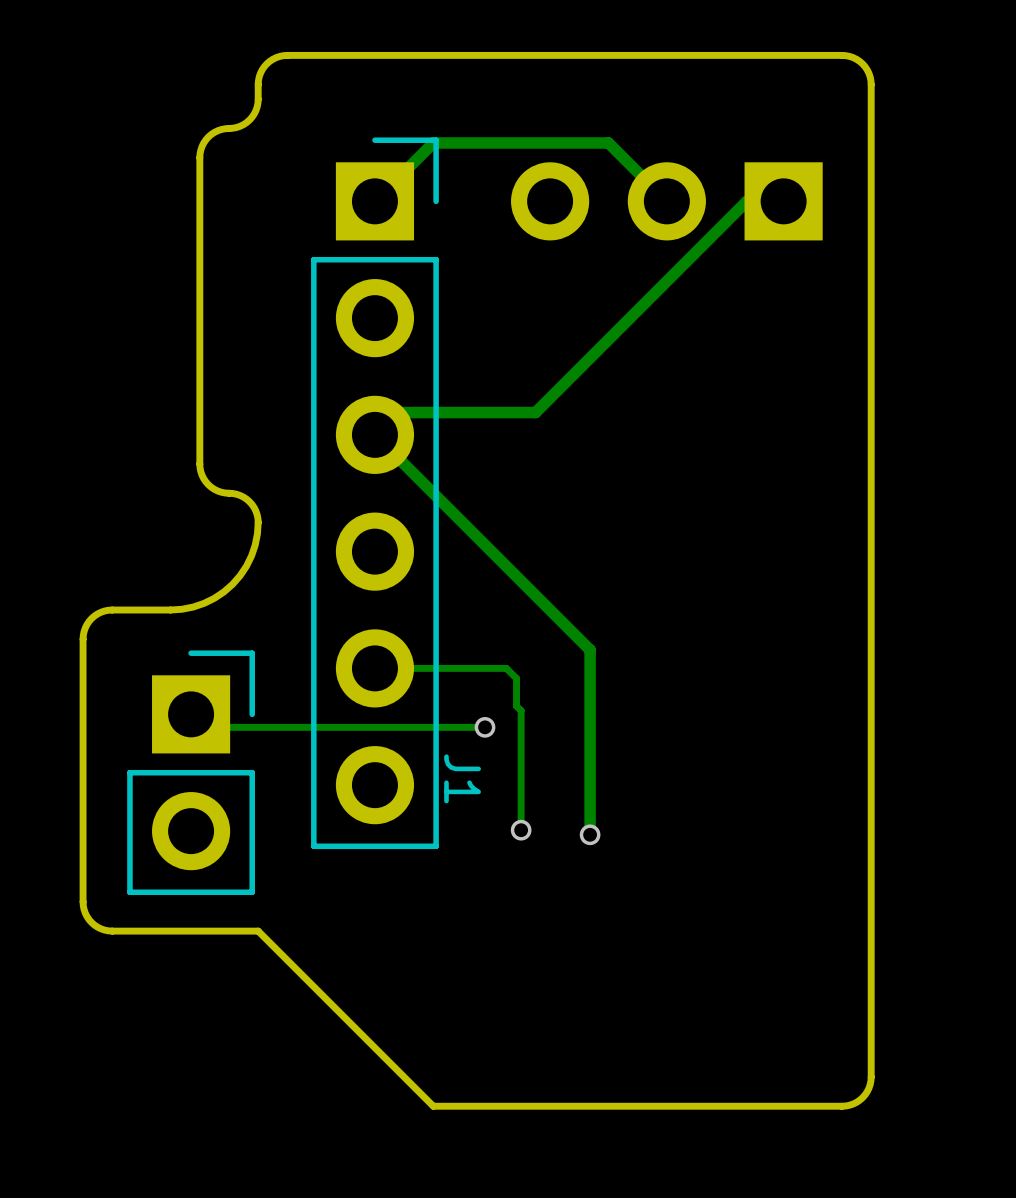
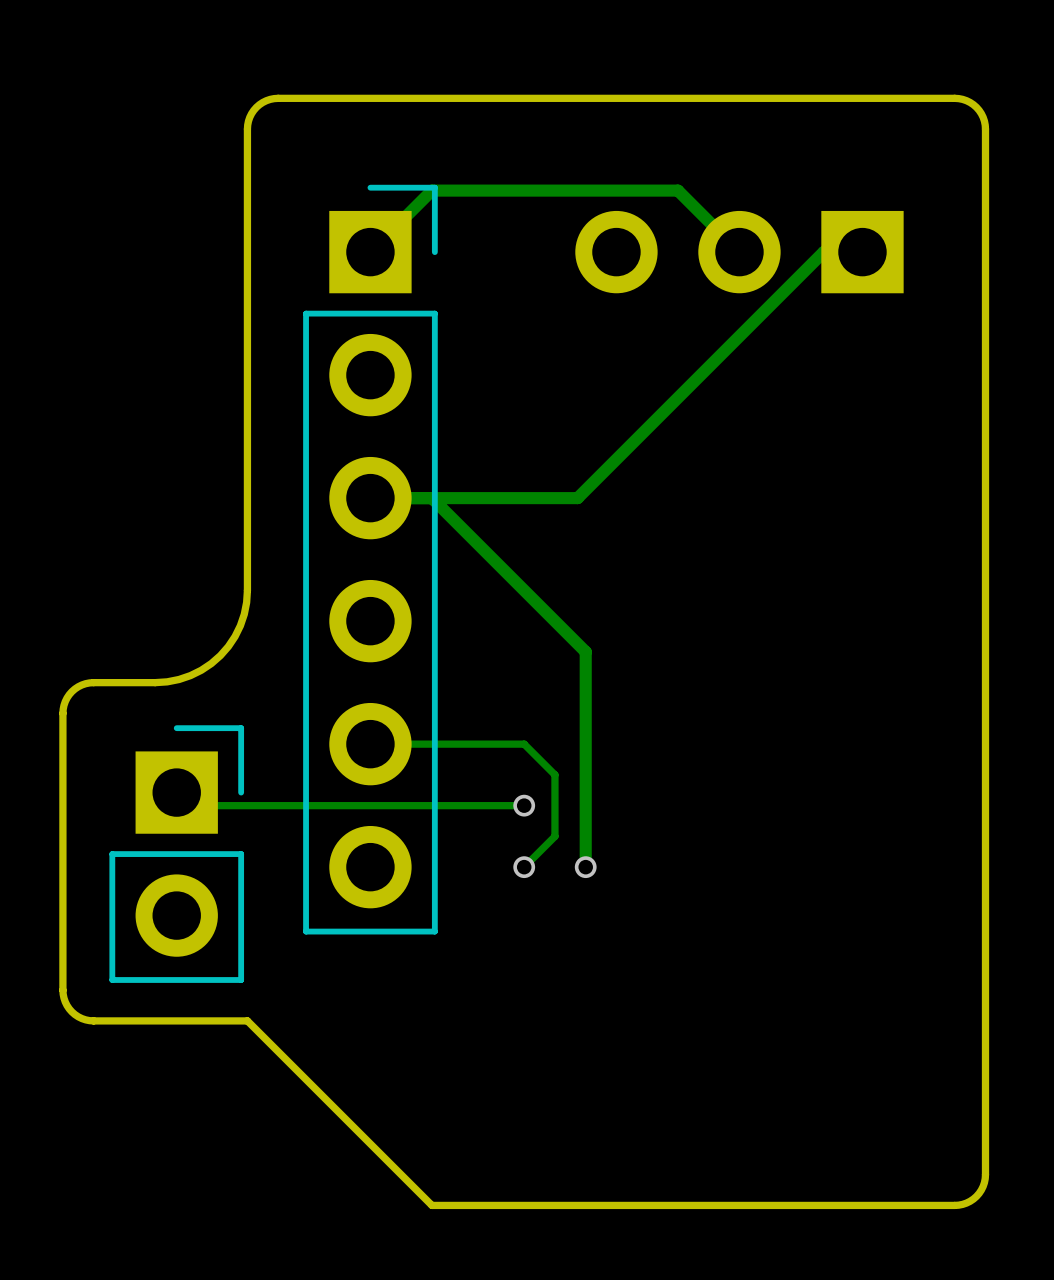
board edge: (842, 55) (853, 57) (862, 63) (868, 73) (871, 84) (871, 1077) (868, 1088) (862, 1097) (853, 1104) (842, 1106) -> (862, 98) (962, 99) (970, 102) (979, 110) (985, 125) (985, 1174) (983, 1186) (976, 1196) (966, 1203) (954, 1205)
board edge: (258, 99) (255, 110) (249, 119) (240, 126) (221, 129) (211, 134) (202, 146) (199, 157) (200, 467) (203, 478) (211, 487) (221, 492) (240, 495) (249, 501) (255, 511) (258, 522) -> (247, 144) (247, 590)
track: (608, 142) (666, 201) -> (616, 190) (677, 190) (739, 252)
part position: (666, 201) -> (739, 252)
track: (783, 201) (746, 201) (535, 412) (397, 412) (374, 434) (590, 650) (590, 834) -> none
track: none -> (862, 252) (823, 252) (577, 498) (370, 498)
track: none -> (431, 498) (585, 651) (585, 867)
track: (506, 668) (516, 678) (516, 706) (521, 710) (521, 830) -> (508, 744) (524, 744) (554, 774) (554, 836) (524, 867)
via: none -> (524, 805)
track: (485, 727) (204, 727) -> (524, 805) (189, 805)
via: (485, 727) -> none
J1 name: J1 (462, 778) -> none
via: none -> (524, 867)
via: none -> (585, 867)
via: (521, 830) -> none
via: (590, 834) -> none
board edge: none -> (954, 1205) (862, 1205)

